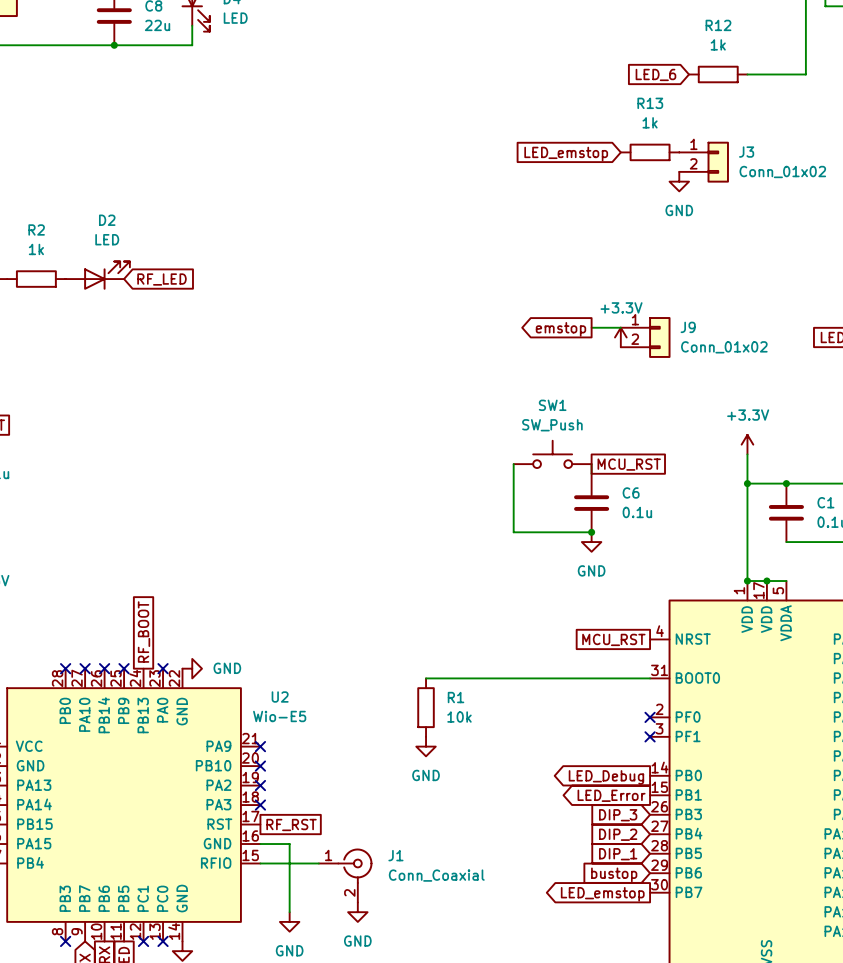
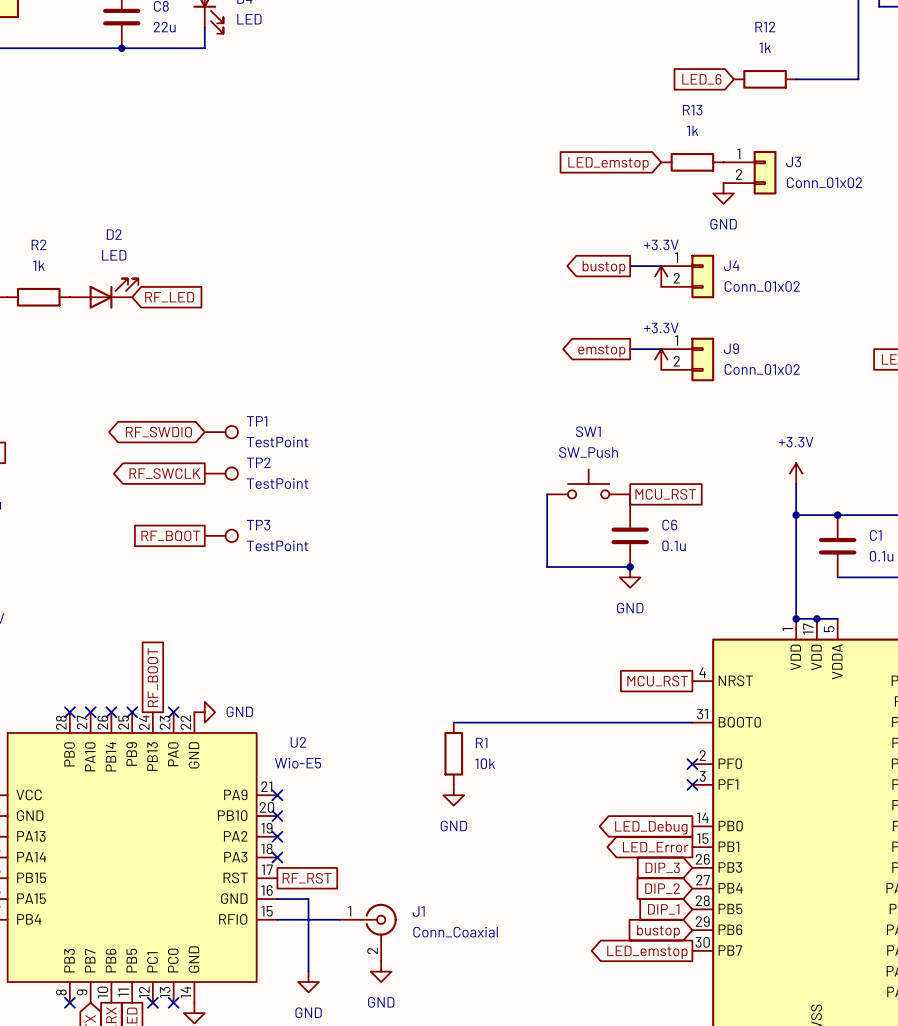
wire: none -> (630, 266) (661, 266)
global label: none -> bustop (603, 267)
power symbol: none -> +3.3V (661, 276)
J4: none -> Conn_01x02 (687, 276)
TP1: none -> TestPoint (221, 432)
global label: none -> RF_SWDIO (158, 432)
TP2: none -> TestPoint (221, 473)
global label: none -> RF_SWCLK (164, 473)
global label: none -> RF_BOOT (170, 535)
TP3: none -> TestPoint (221, 535)

